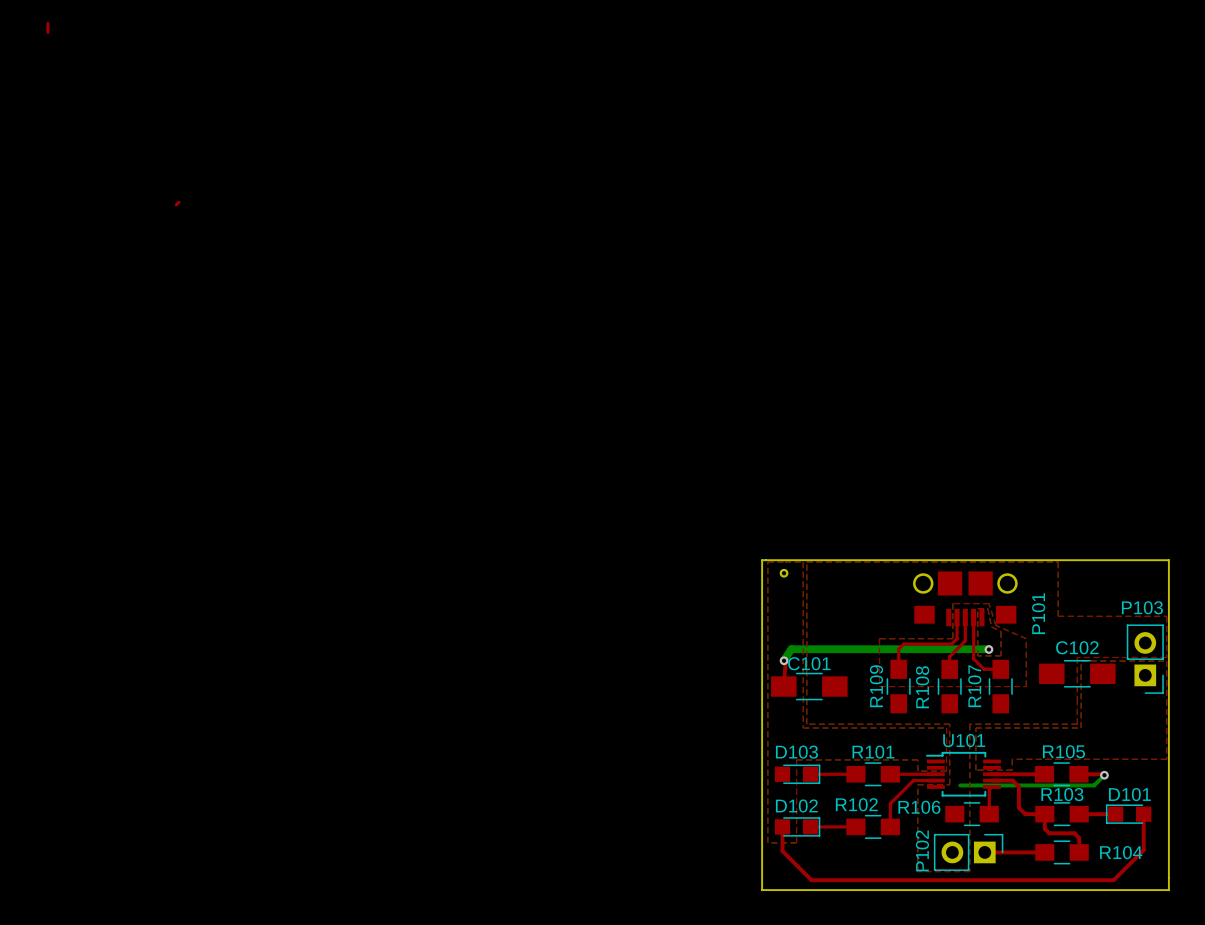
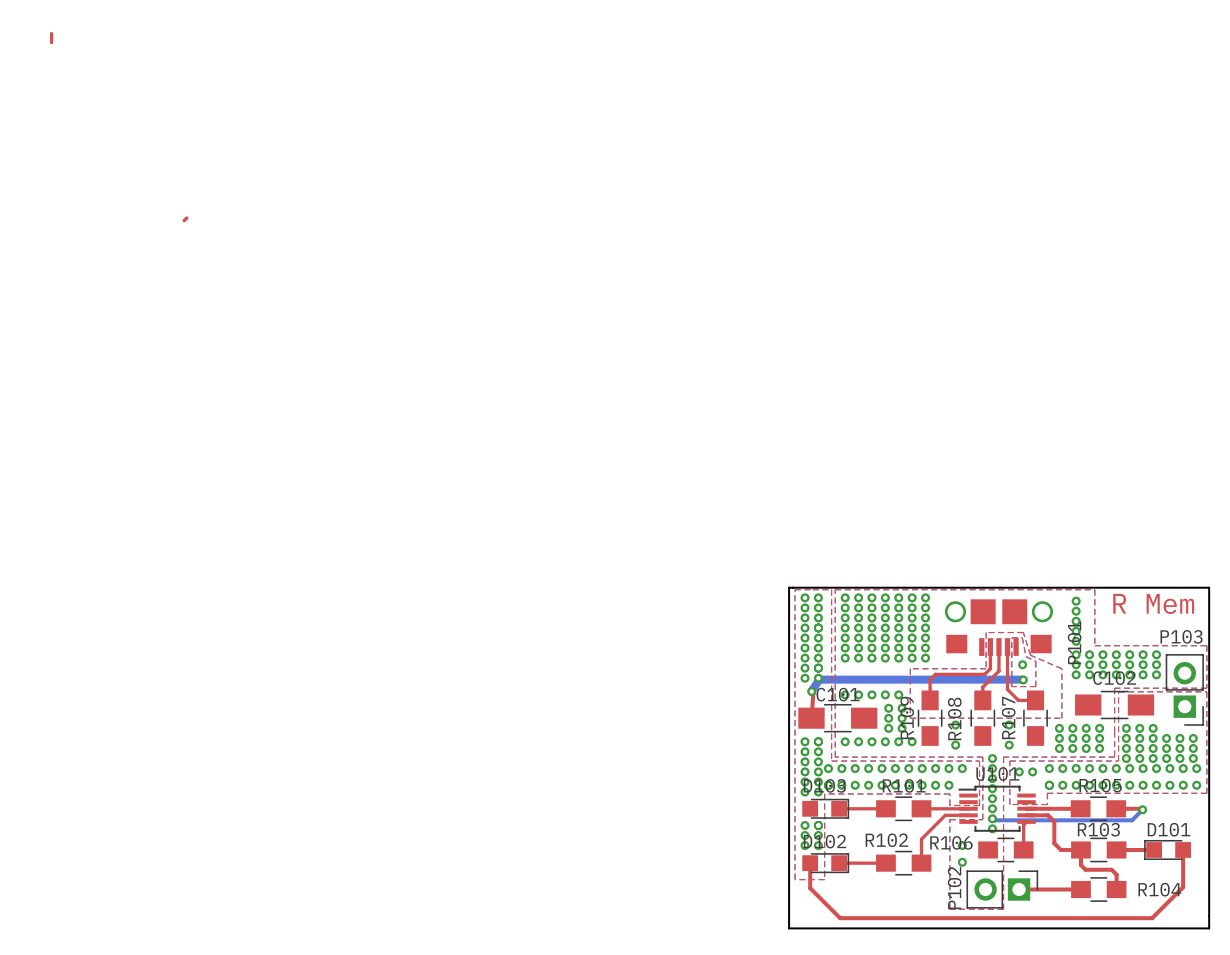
part: none -> (805, 597)
part: none -> (818, 597)
part: none -> (845, 597)
part: none -> (858, 597)
part: none -> (871, 597)
part: none -> (885, 597)
part: none -> (898, 597)
part: none -> (912, 597)
part: none -> (925, 597)
part: (784, 573) -> none
part: none -> (1076, 601)
text: none -> R Mem (1153, 603)
part: none -> (805, 607)
part: none -> (818, 607)
part: none -> (845, 607)
part: none -> (858, 607)
part: none -> (871, 607)
part: none -> (885, 607)
part: none -> (898, 607)
part: none -> (912, 607)
part: none -> (925, 607)
part: none -> (1076, 611)
part: none -> (805, 617)
part: none -> (818, 617)
part: none -> (845, 617)
part: none -> (858, 617)
part: none -> (871, 617)
part: none -> (885, 617)
part: none -> (898, 617)
part: none -> (912, 617)
part: none -> (925, 617)
part: none -> (1076, 621)
part: none -> (805, 627)
part: none -> (818, 627)
part: none -> (845, 627)
part: none -> (858, 627)
part: none -> (871, 627)
part: none -> (885, 627)
part: none -> (898, 627)
part: none -> (912, 627)
part: none -> (925, 627)
part: none -> (1076, 631)
part: none -> (805, 638)
part: none -> (818, 638)
part: none -> (845, 638)
part: none -> (858, 638)
part: none -> (871, 638)
part: none -> (885, 638)
part: none -> (898, 638)
part: none -> (912, 638)
part: none -> (925, 638)
part: none -> (1076, 641)
part: none -> (805, 648)
part: none -> (818, 648)
part: none -> (845, 648)
part: none -> (858, 648)
part: none -> (871, 648)
part: none -> (885, 648)
part: none -> (898, 648)
part: none -> (912, 648)
part: none -> (925, 648)
part: none -> (1076, 654)
part: none -> (1089, 654)
part: none -> (1102, 654)
part: none -> (1116, 654)
part: none -> (1129, 654)
part: none -> (1143, 654)
part: none -> (1156, 654)
part: none -> (805, 658)
part: none -> (818, 658)
part: none -> (845, 658)
part: none -> (858, 658)
part: none -> (871, 658)
part: none -> (885, 658)
part: none -> (898, 658)
part: none -> (912, 658)
part: none -> (925, 658)
part: none -> (1022, 664)
part: none -> (1076, 664)
part: none -> (1089, 664)
part: none -> (1102, 664)
part: none -> (1116, 664)
part: none -> (1129, 664)
part: none -> (1143, 664)
part: none -> (1156, 664)
part: none -> (805, 668)
part: none -> (818, 668)
part: none -> (1076, 674)
part: none -> (1089, 674)
part: none -> (1102, 674)
part: none -> (1116, 674)
part: none -> (1129, 674)
part: none -> (1143, 674)
part: none -> (1156, 674)
part: none -> (805, 678)
part: none -> (818, 678)
part: none -> (845, 694)
part: none -> (858, 694)
part: none -> (871, 694)
part: none -> (885, 694)
part: none -> (898, 694)
part: none -> (888, 708)
part: none -> (902, 708)
part: none -> (888, 718)
part: none -> (902, 718)
part: none -> (955, 725)
part: none -> (1009, 725)
part: none -> (888, 728)
part: none -> (902, 728)
part: none -> (1059, 728)
part: none -> (1072, 728)
part: none -> (1086, 728)
part: none -> (1099, 728)
part: none -> (1126, 728)
part: none -> (1139, 728)
part: none -> (1153, 728)
part: none -> (1059, 738)
part: none -> (1072, 738)
part: none -> (1086, 738)
part: none -> (1099, 738)
part: none -> (1126, 738)
part: none -> (1139, 738)
part: none -> (1153, 738)
part: none -> (1166, 738)
part: none -> (1179, 738)
part: none -> (1193, 738)
part: none -> (805, 741)
part: none -> (818, 741)
part: none -> (845, 741)
part: none -> (858, 741)
part: none -> (871, 741)
part: none -> (885, 741)
part: none -> (898, 741)
part: none -> (912, 741)
part: none -> (955, 745)
part: none -> (1009, 745)
part: none -> (1059, 748)
part: none -> (1072, 748)
part: none -> (1086, 748)
part: none -> (1099, 748)
part: none -> (1126, 748)
part: none -> (1139, 748)
part: none -> (1153, 748)
part: none -> (1166, 748)
part: none -> (1179, 748)
part: none -> (1193, 748)
part: none -> (805, 751)
part: none -> (818, 751)
part: none -> (992, 758)
part: none -> (1126, 758)
part: none -> (1139, 758)
part: none -> (1153, 758)
part: none -> (1166, 758)
part: none -> (1179, 758)
part: none -> (1193, 758)
part: none -> (805, 761)
part: none -> (818, 761)
part: none -> (828, 768)
part: none -> (841, 768)
part: none -> (855, 768)
part: none -> (868, 768)
part: none -> (882, 768)
part: none -> (895, 768)
part: none -> (908, 768)
part: none -> (922, 768)
part: none -> (935, 768)
part: none -> (948, 768)
part: none -> (962, 768)
part: none -> (992, 768)
part: none -> (1049, 768)
part: none -> (1062, 768)
part: none -> (1076, 768)
part: none -> (1089, 768)
part: none -> (1102, 768)
part: none -> (1116, 768)
part: none -> (1129, 768)
part: none -> (1143, 768)
part: none -> (1156, 768)
part: none -> (1169, 768)
part: none -> (1183, 768)
part: none -> (1196, 768)
part: none -> (805, 771)
part: none -> (818, 771)
part: none -> (1019, 771)
part: none -> (1032, 771)
part: none -> (992, 778)
part: none -> (805, 781)
part: none -> (818, 781)
part: none -> (828, 785)
part: none -> (841, 785)
part: none -> (855, 785)
part: none -> (868, 785)
part: none -> (882, 785)
part: none -> (895, 785)
part: none -> (908, 785)
part: none -> (922, 785)
part: none -> (935, 785)
part: none -> (948, 785)
part: none -> (1049, 785)
part: none -> (1062, 785)
part: none -> (1076, 785)
part: none -> (1089, 785)
part: none -> (1102, 785)
part: none -> (1116, 785)
part: none -> (1129, 785)
part: none -> (1143, 785)
part: none -> (1156, 785)
part: none -> (1169, 785)
part: none -> (1183, 785)
part: none -> (1196, 785)
part: none -> (992, 788)
part: none -> (805, 791)
part: none -> (818, 791)
part: none -> (992, 798)
part: none -> (992, 808)
part: none -> (992, 818)
part: none -> (805, 825)
part: none -> (818, 825)
part: none -> (992, 828)
part: none -> (805, 835)
part: none -> (818, 835)
part: none -> (805, 845)
part: none -> (818, 845)
part: none -> (962, 845)
part: none -> (962, 862)

